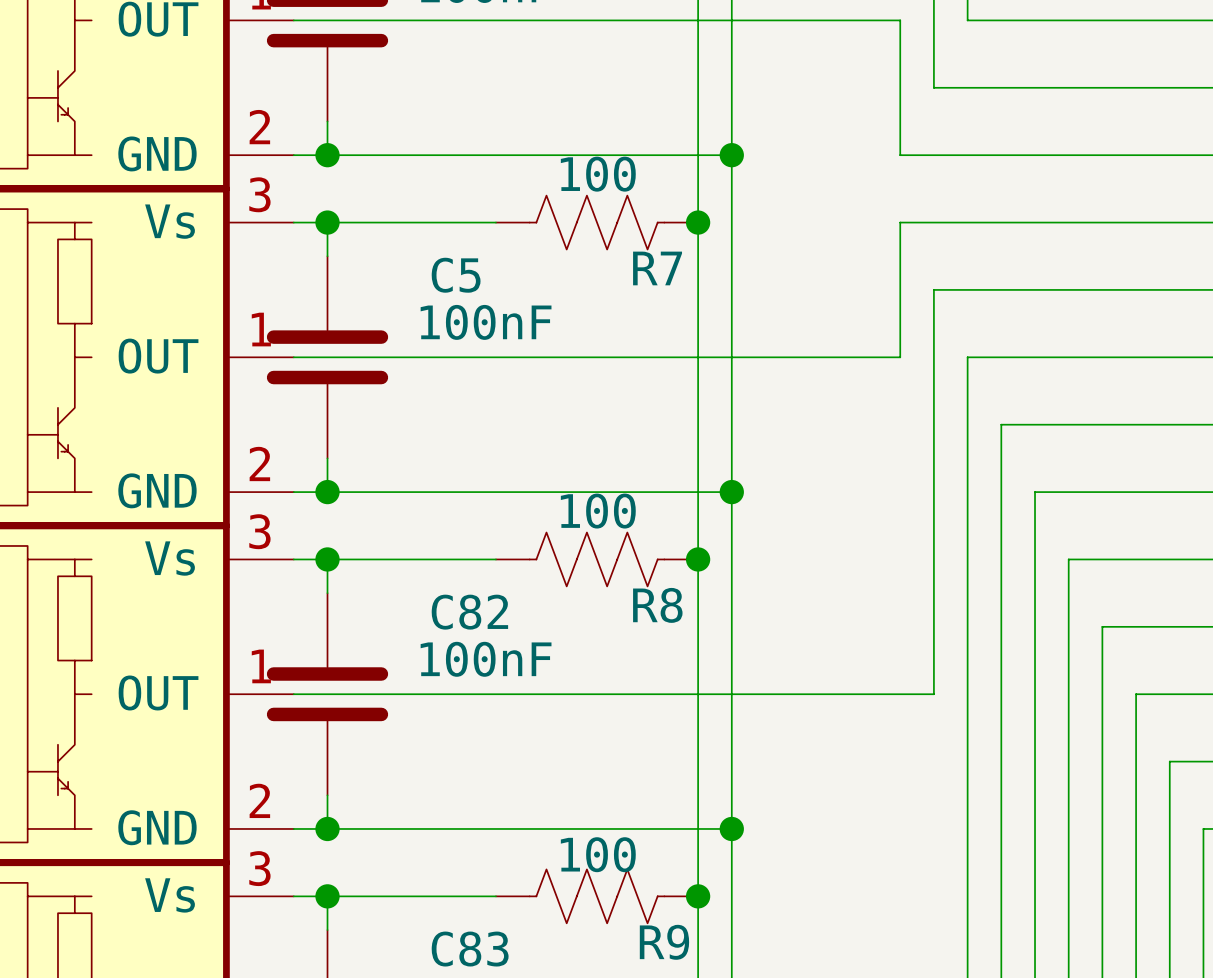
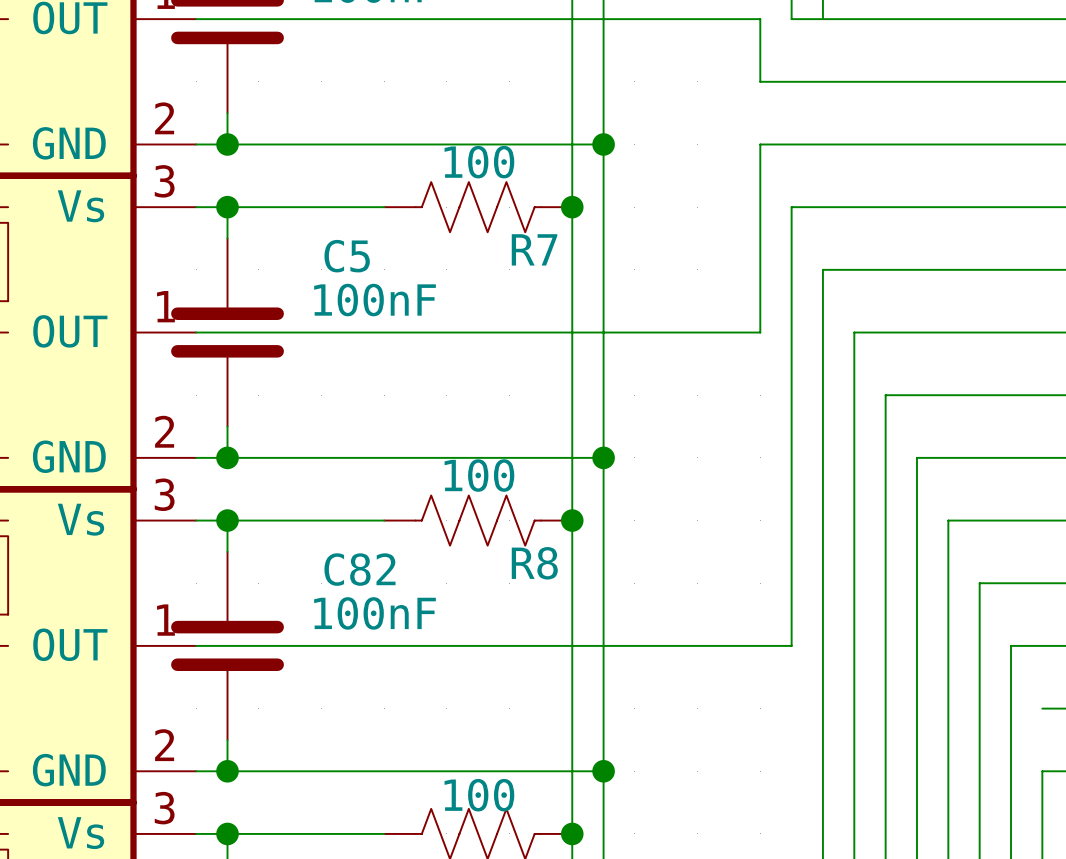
wire: (933, 20) (933, 87) -> (791, 19) (822, 19)
wire: (900, 87) (900, 155) -> (760, 81) (791, 81)
wire: (900, 222) (933, 222) -> (760, 207) (760, 144)
wire: (933, 289) (967, 289) -> (791, 269) (791, 207)
wire: none -> (822, 269) (822, 332)
wire: (967, 357) (1001, 357) -> (854, 395) (854, 332)
wire: (1001, 424) (1035, 424) -> (885, 457) (885, 395)
wire: (1035, 492) (1068, 492) -> (916, 520) (916, 457)
wire: (1068, 559) (1102, 559) -> (948, 583) (948, 520)
wire: (1102, 626) (1136, 626) -> (979, 645) (979, 583)
wire: (1136, 694) (1169, 694) -> none
wire: (1169, 761) (1203, 761) -> (1011, 708) (1011, 645)

